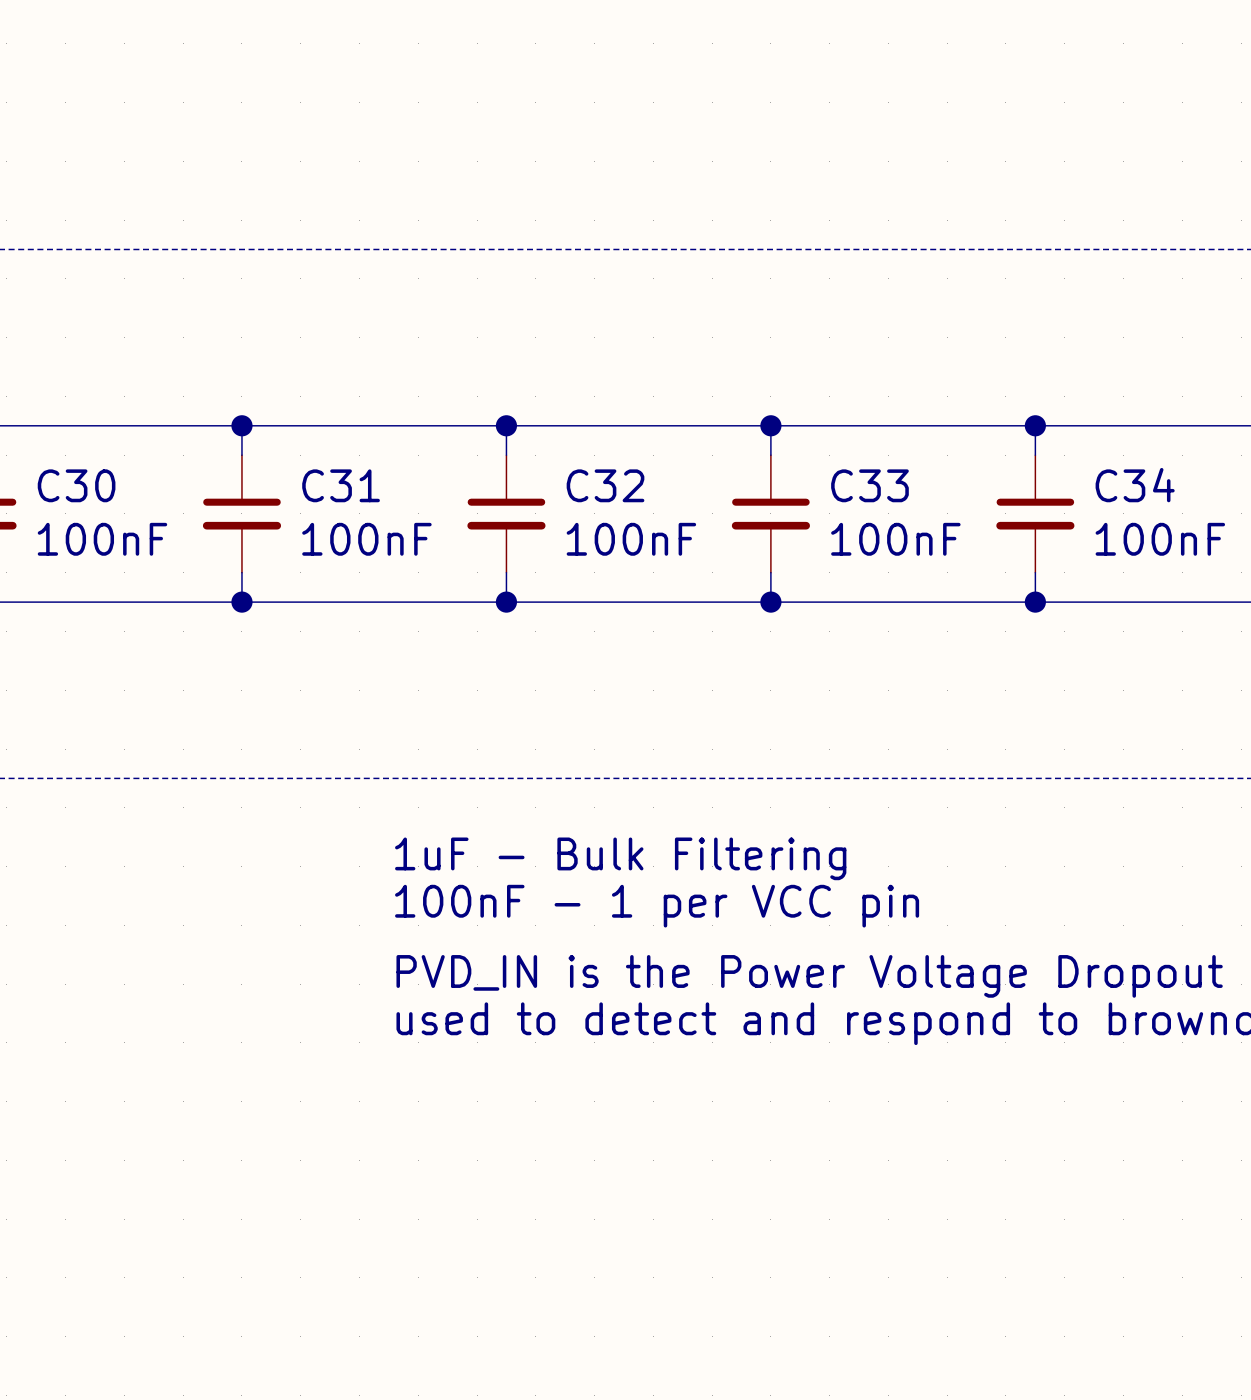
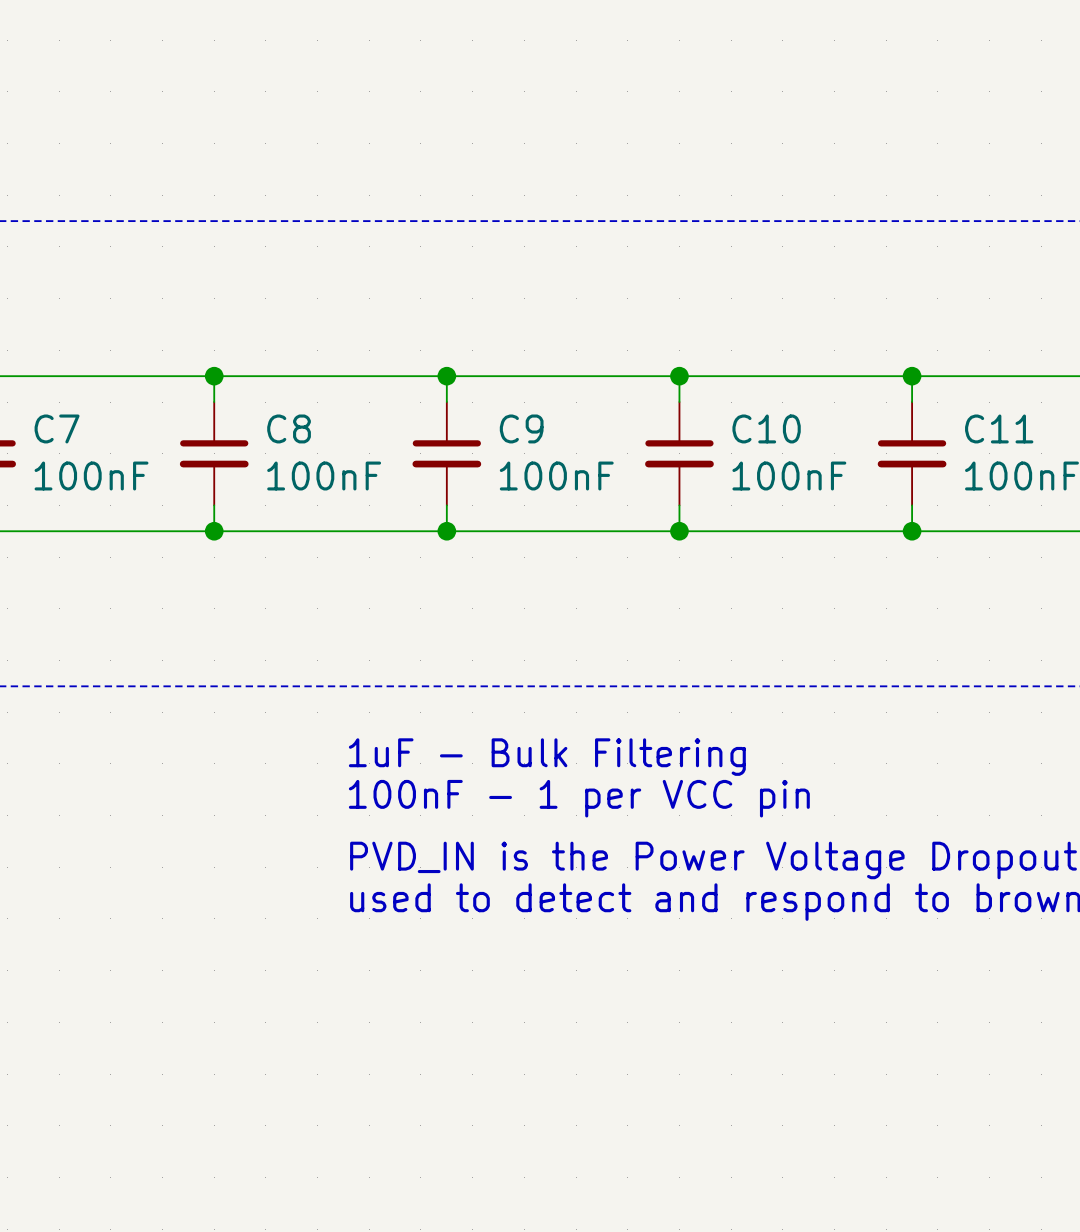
C30 name: C30 (76, 485) -> C7 (57, 428)
C31 name: C31 (341, 485) -> C8 (289, 428)
C32 name: C32 (605, 485) -> C9 (521, 428)
C33 name: C33 (869, 485) -> C10 (766, 428)
C34 name: C34 (1135, 485) -> C11 (999, 428)

